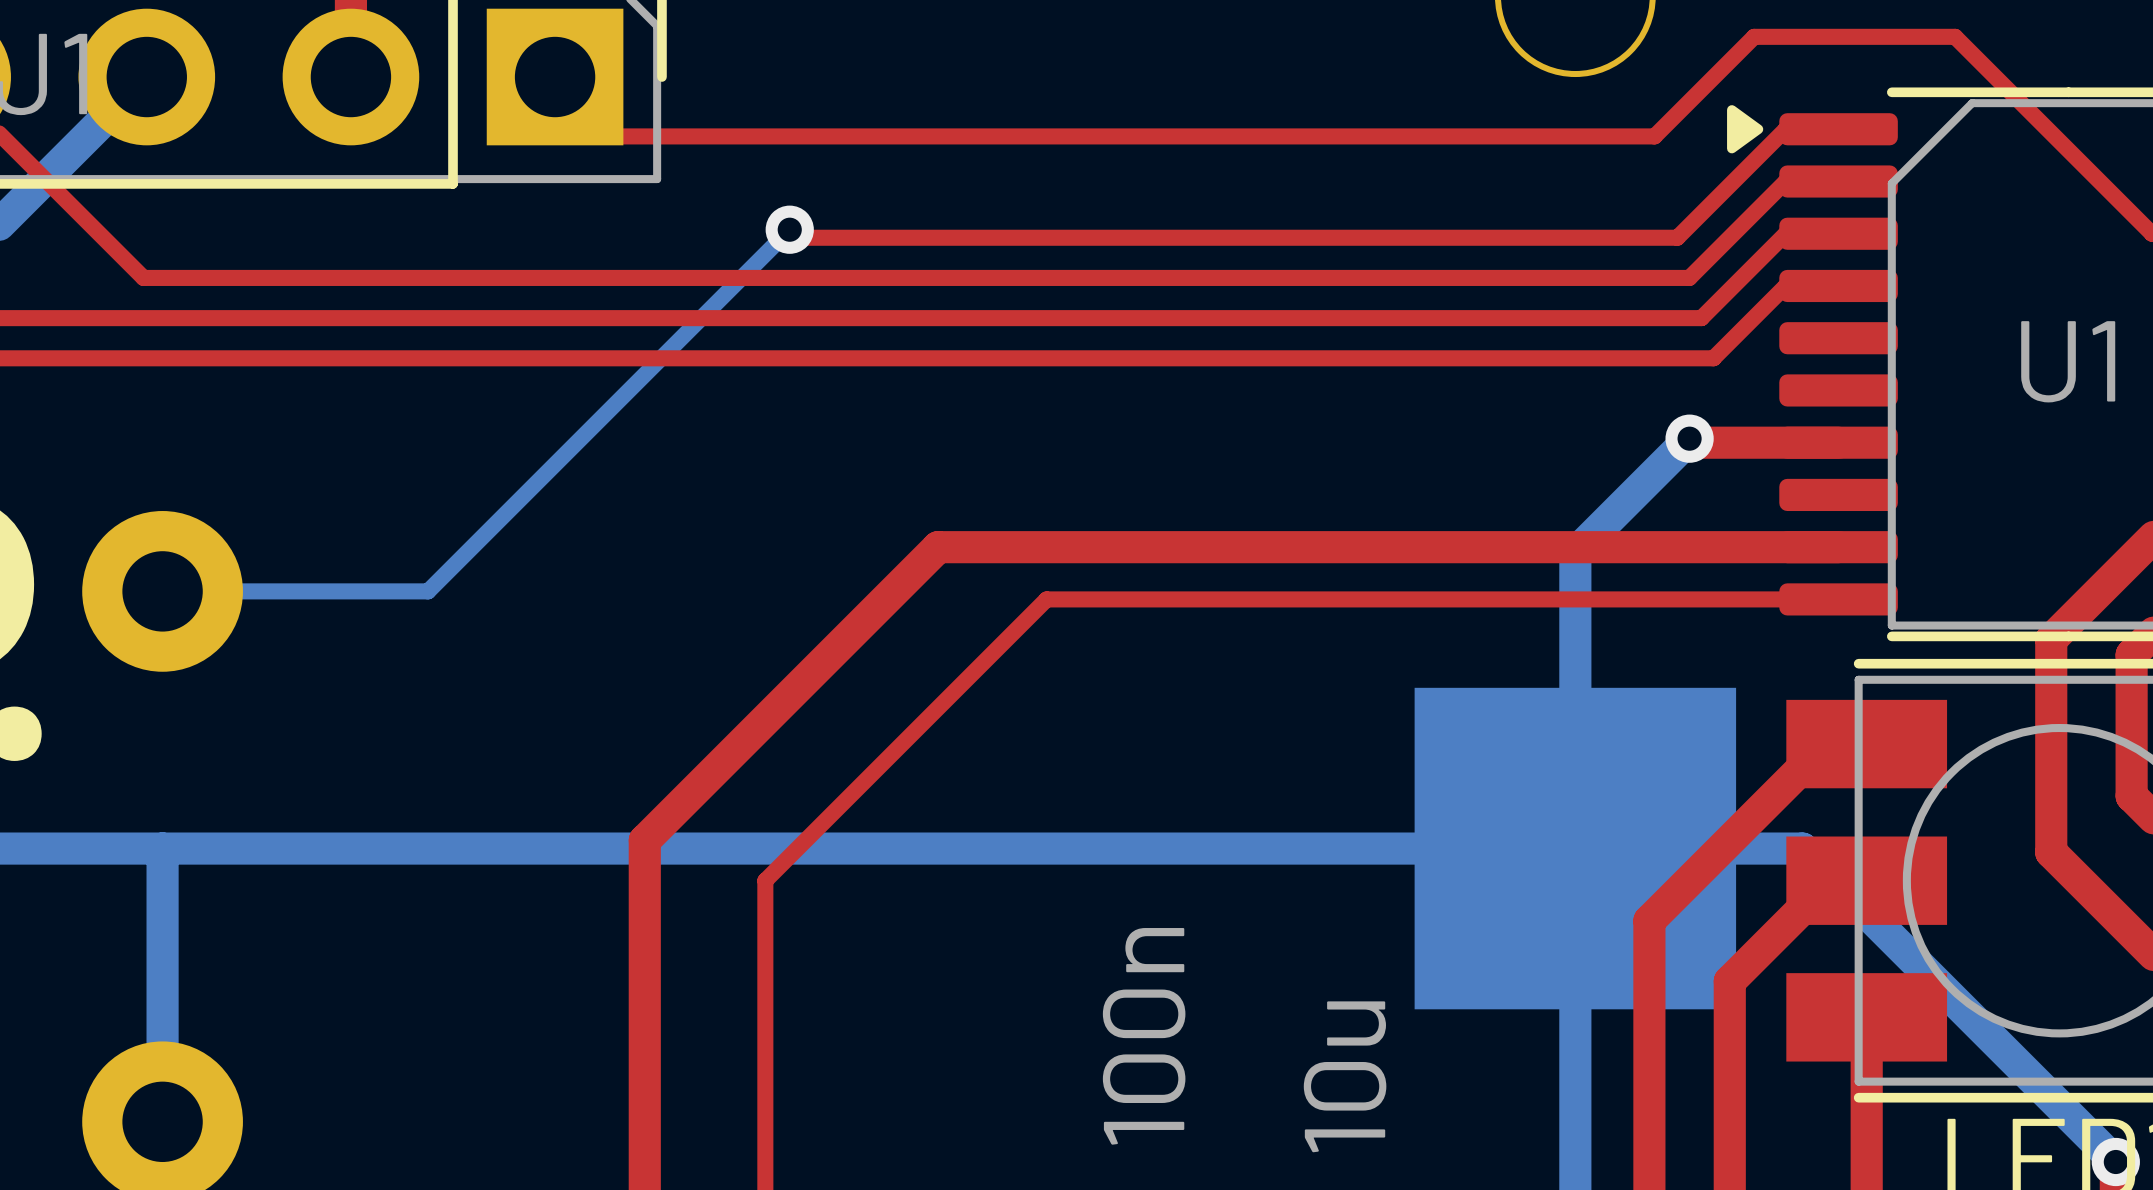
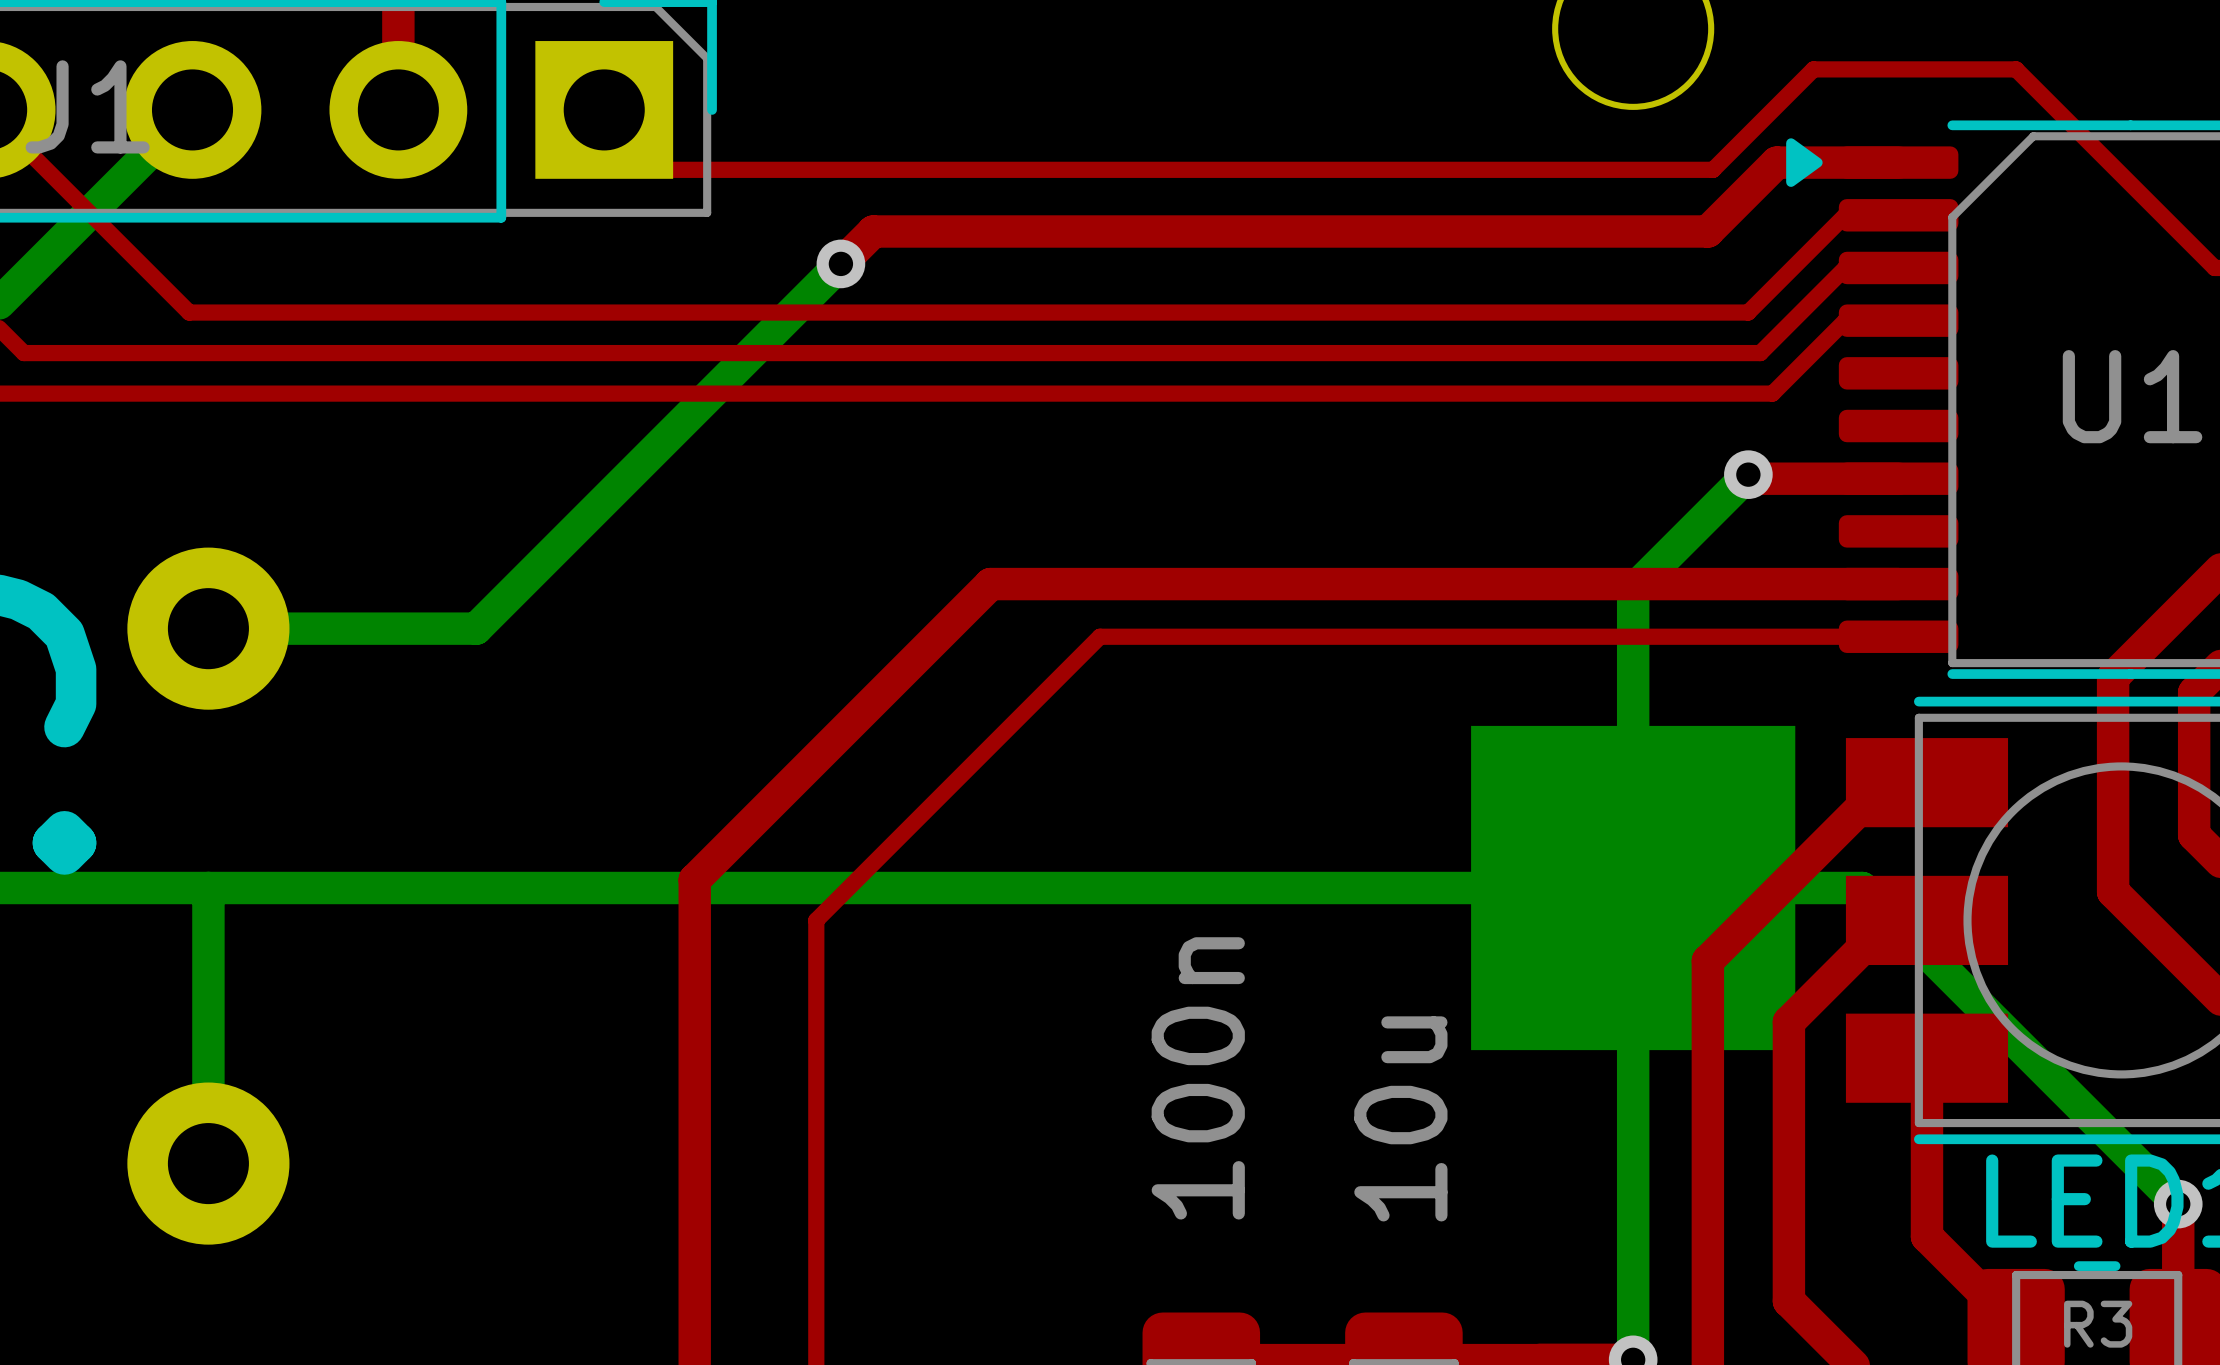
top track: (1785, 129) (1677, 237) (797, 237) -> (1845, 162) (1776, 162) (1707, 231) (873, 231) (840, 263)
bottom track width: thin (789, 229) (428, 591) (162, 591) -> thick (840, 263) (476, 628) (208, 628)

